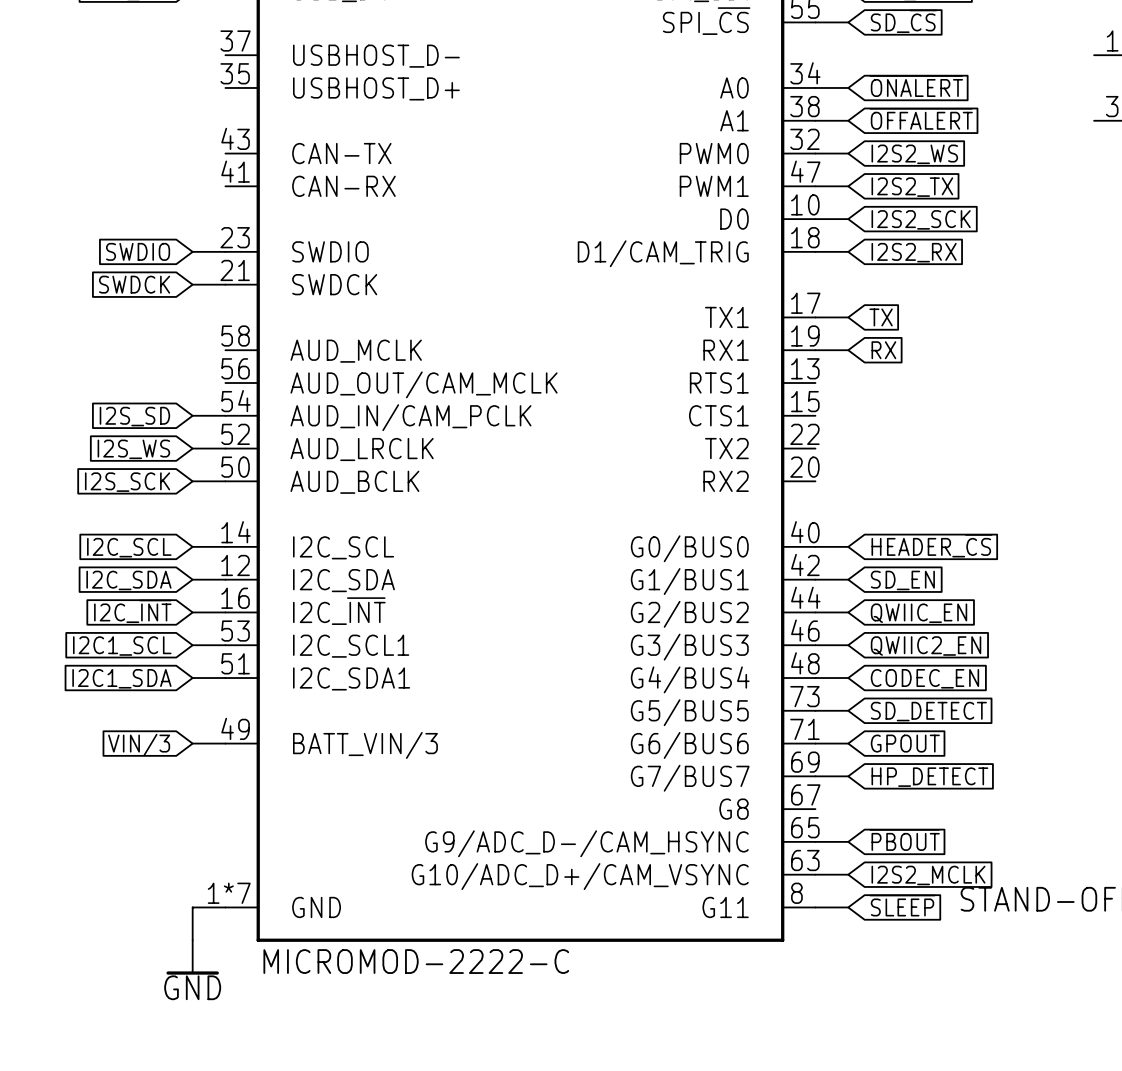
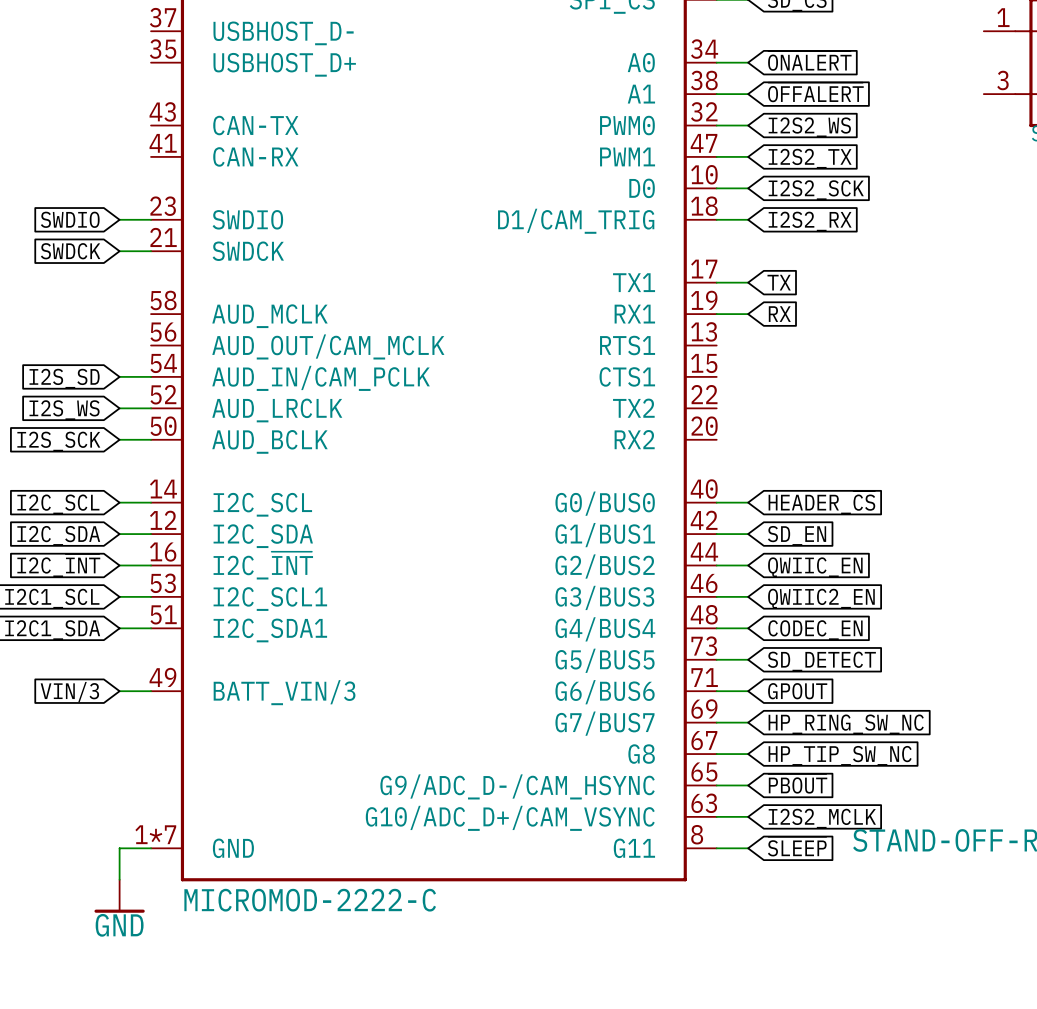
global label: HP_DETECT (929, 777) -> HP_RING_SW_NC (846, 724)
wire: none -> (716, 754) (748, 754)
global label: none -> HP_TIP_SW_NC (840, 755)

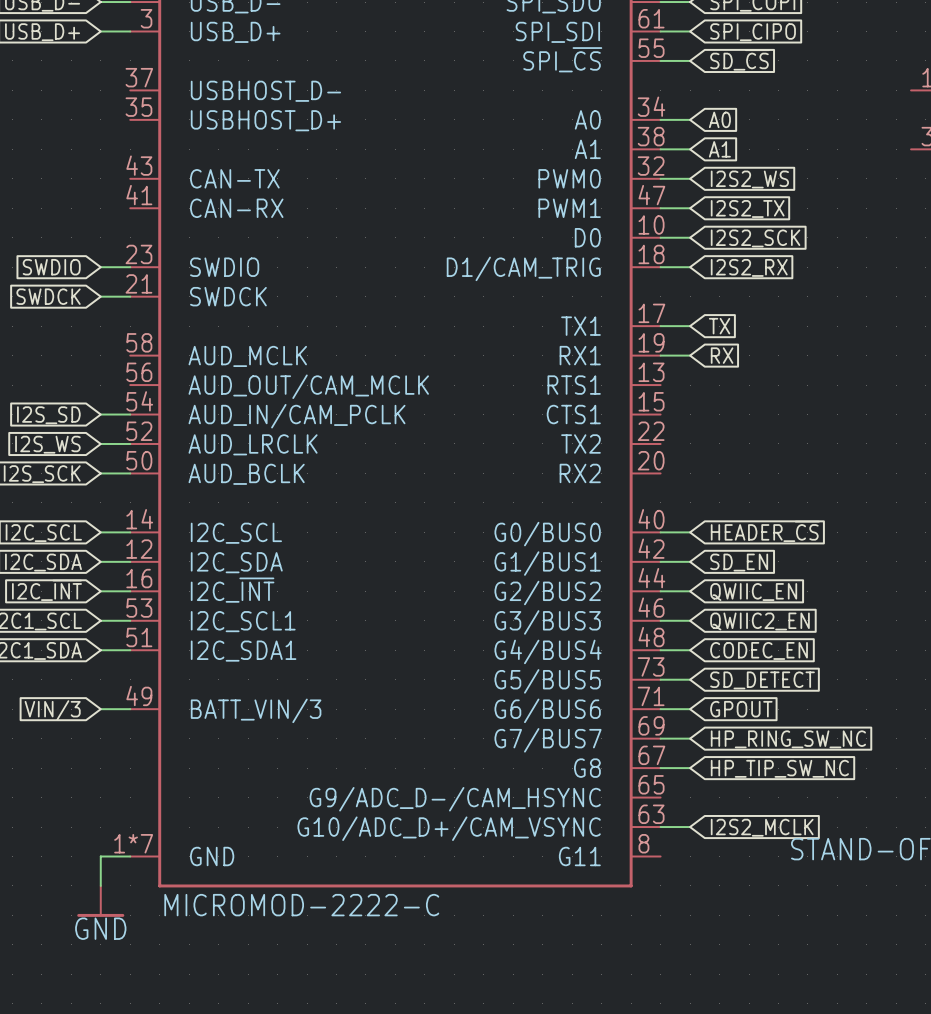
global label: ~{ONALERT} (809, 61) -> A0 (719, 119)
global label: ~{OFFALERT} (815, 92) -> A1 (719, 149)
global label: ~{PBOUT} (797, 783) -> none
wire: (716, 785) (748, 785) -> none
global label: ~{SLEEP} (797, 846) -> none
wire: (716, 848) (748, 848) -> none

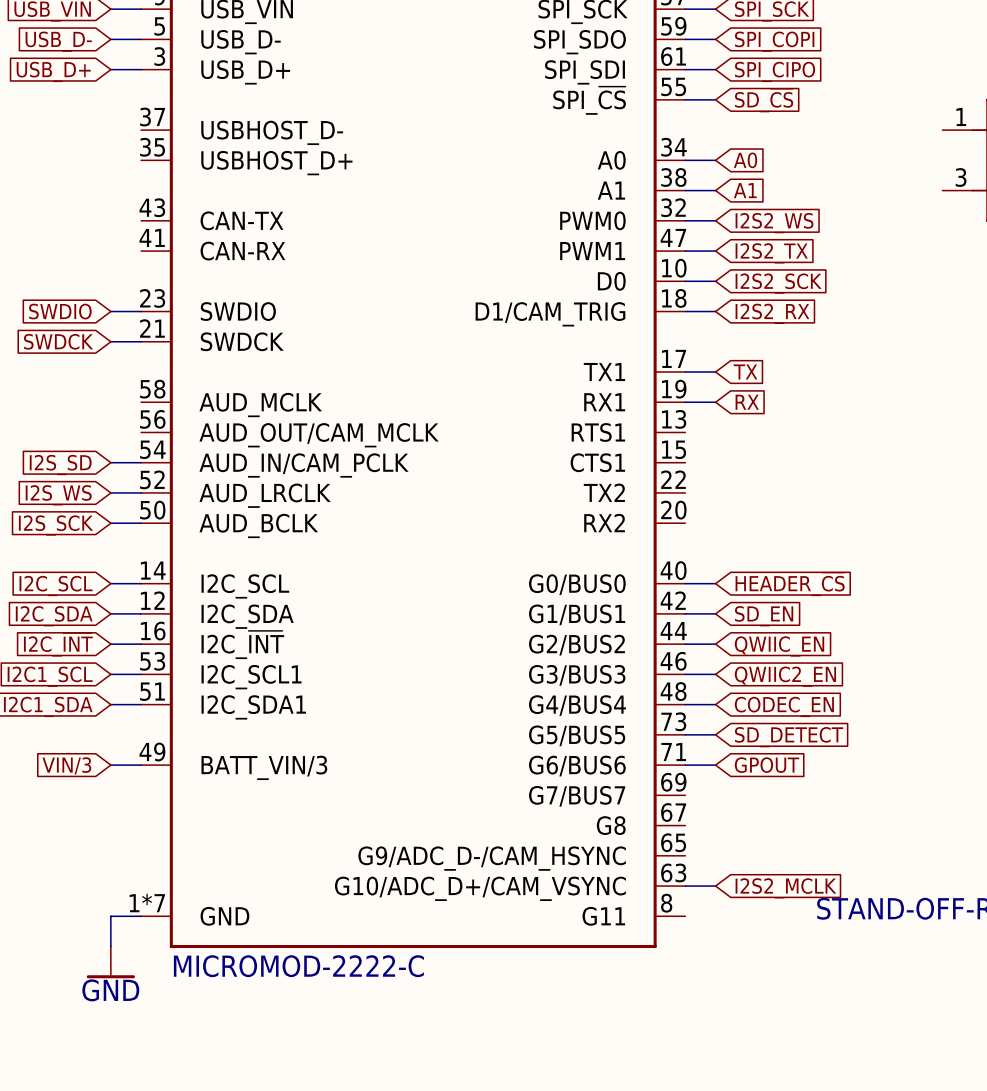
wire: (660, 738) (690, 738) -> none
global label: HP_RING_SW_NC (788, 739) -> none
wire: (660, 768) (690, 768) -> none
global label: HP_TIP_SW_NC (779, 768) -> none

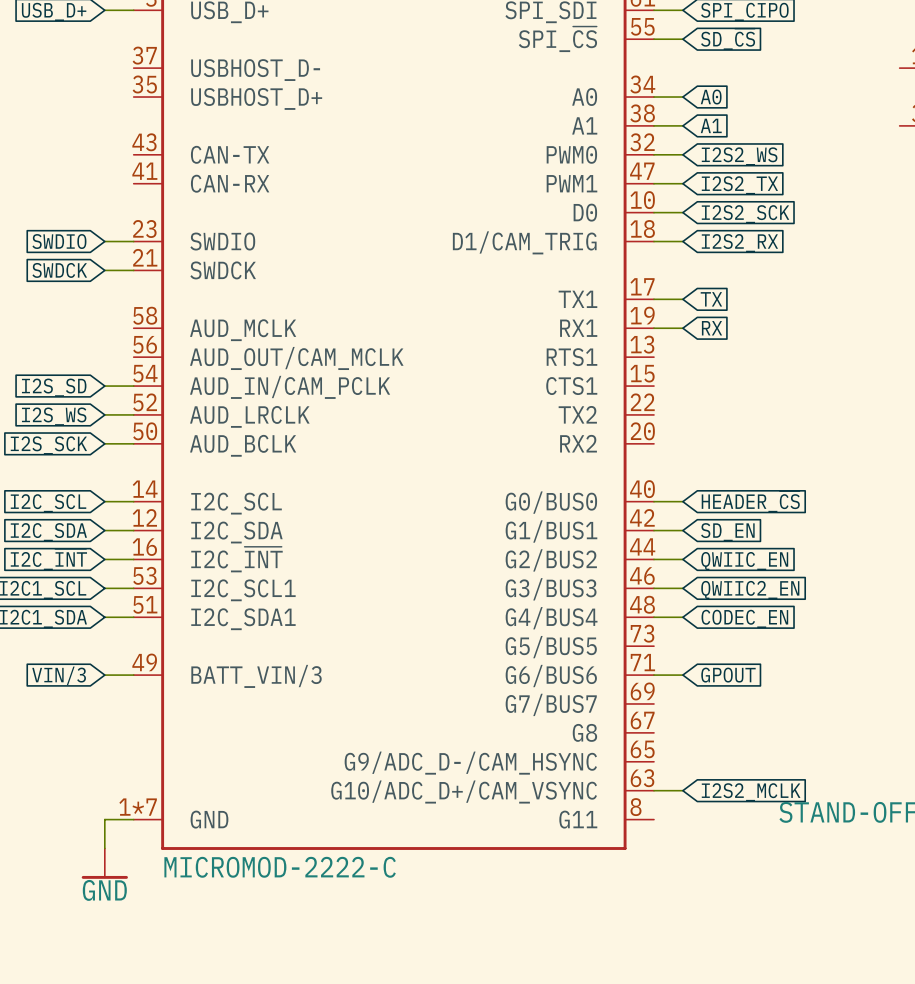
wire: (685, 734) (715, 734) -> none
global label: SD_DETECT (789, 737) -> none

